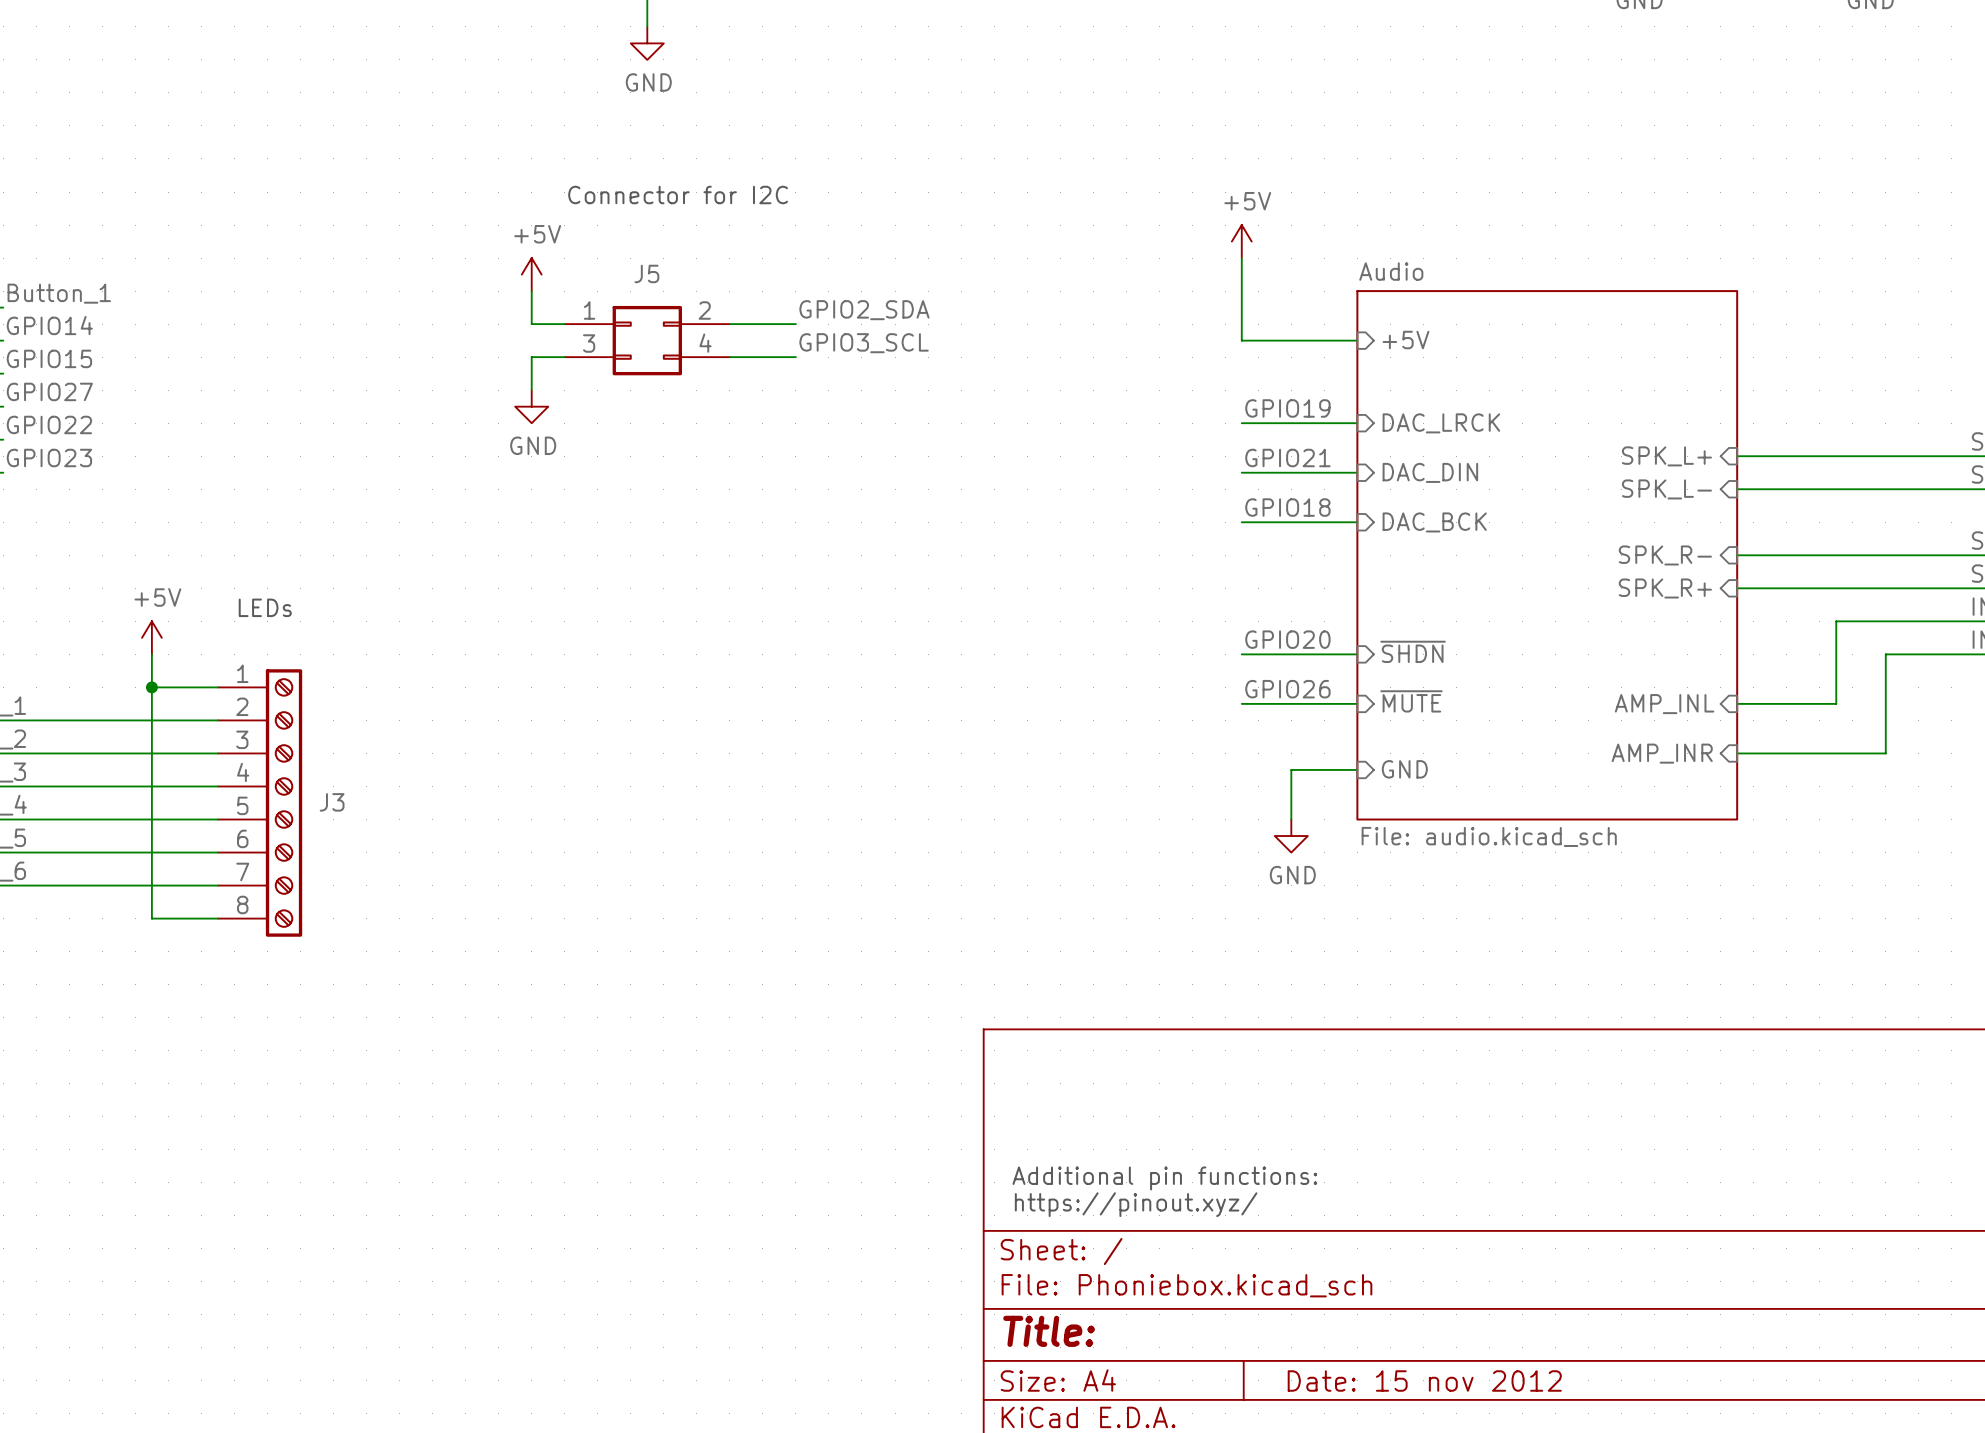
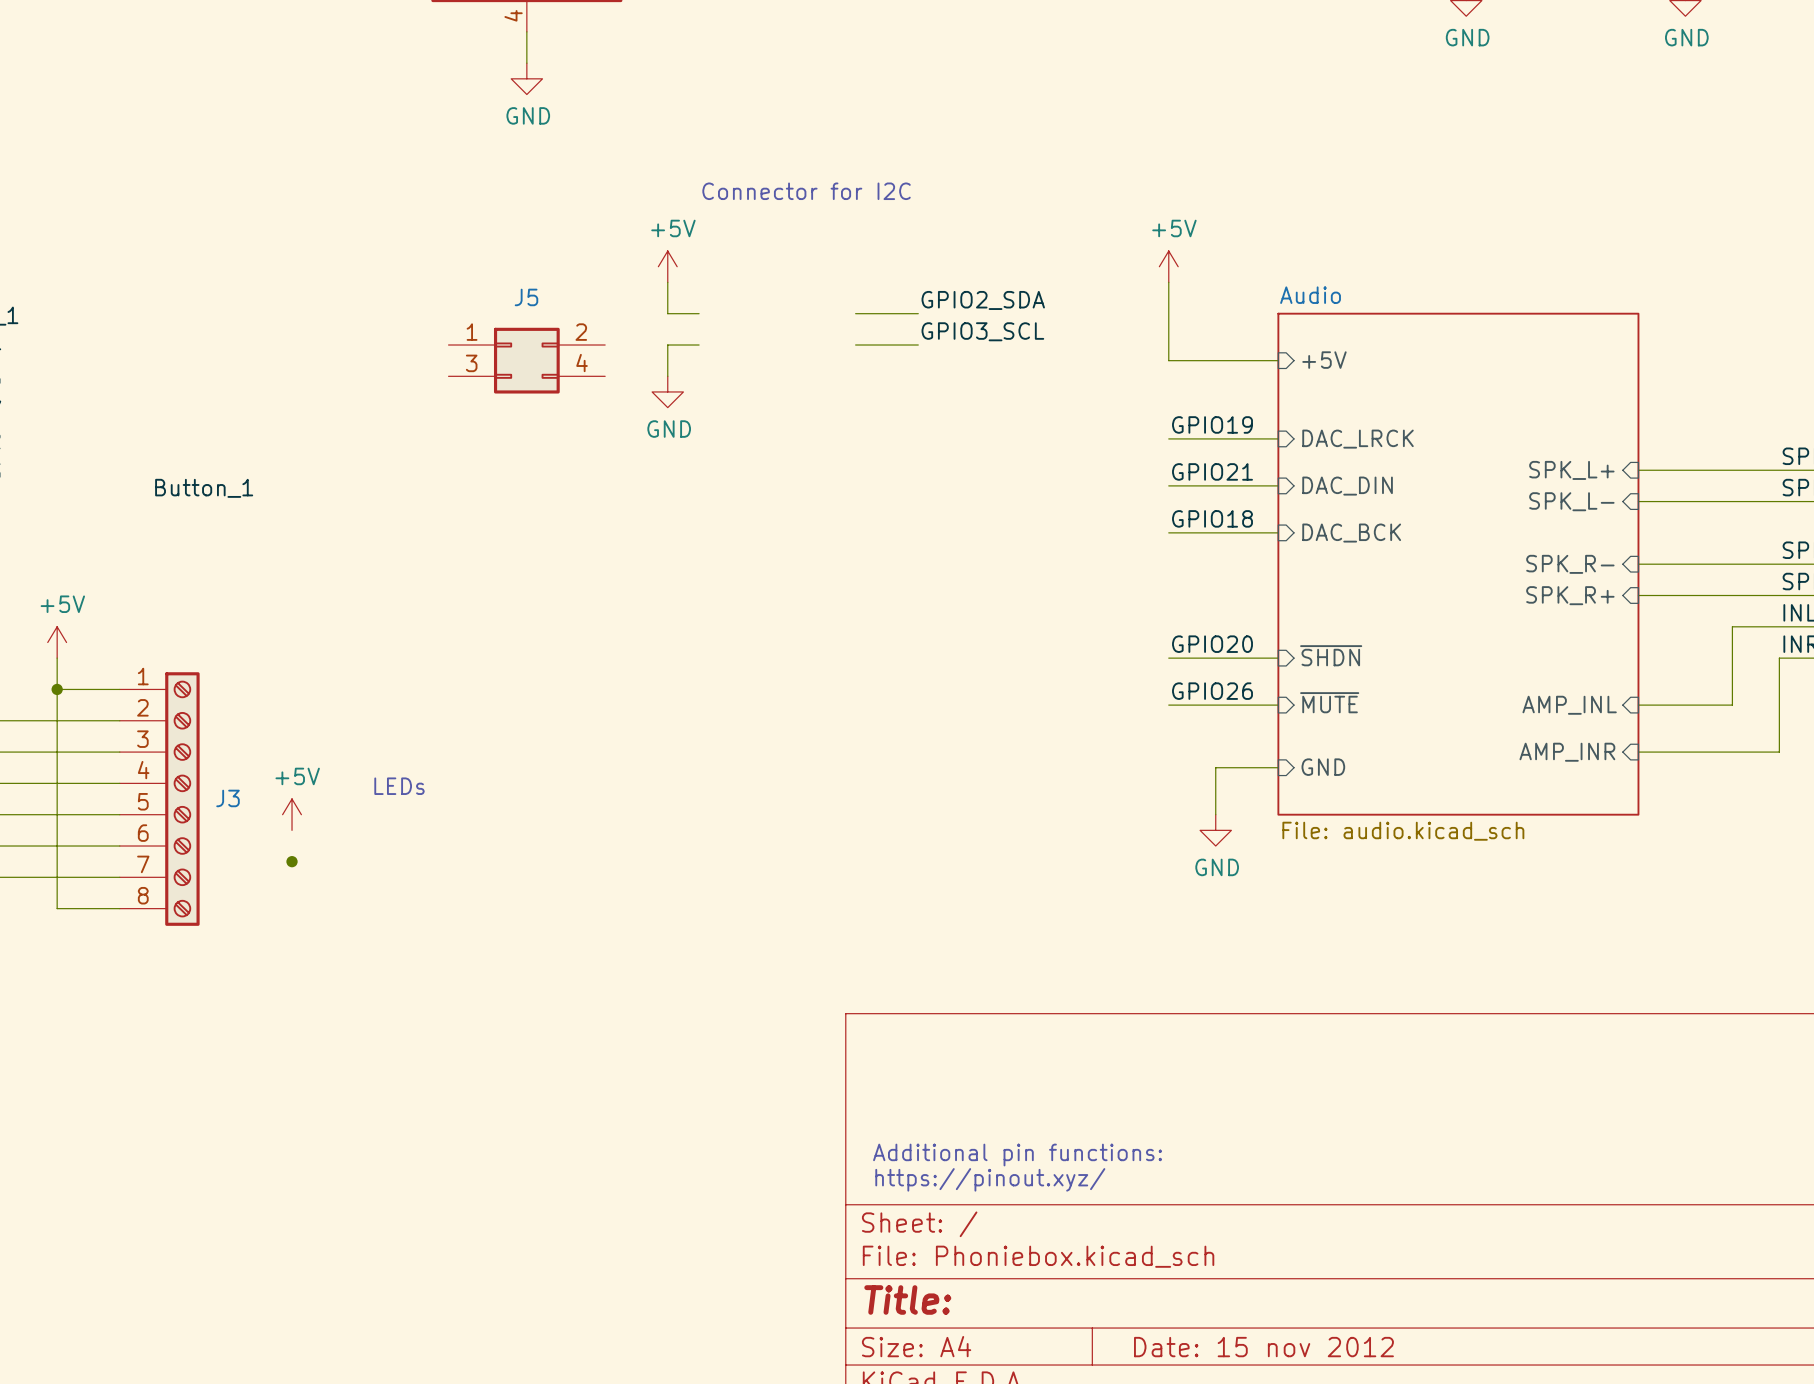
text position: Connector for I2C (678, 194) -> Connector for I2C (806, 191)
power symbol: none -> +5V (667, 266)
power symbol position: +5V (1241, 241) -> +5V (1168, 266)
wire: (1241, 258) (1241, 340) (1324, 340) -> (1168, 282) (1168, 360)
power symbol: +5V (531, 274) -> none
wire: (531, 291) (531, 324) (564, 324) -> (667, 282) (667, 313) (699, 313)
label position: GPIO2_SDA (864, 310) -> GPIO2_SDA (983, 300)
wire: (729, 324) (795, 324) -> (855, 313) (918, 313)
wire: none -> (855, 345) (918, 345)
wire: none -> (1200, 360) (1278, 360)
sheet pin position: +5V (1405, 340) -> +5V (1324, 360)
label position: GPIO3_SCL (864, 343) -> GPIO3_SCL (982, 331)
wire: (564, 357) (531, 357) (531, 390) -> none
wire: (729, 357) (795, 357) -> (699, 345) (667, 345) (667, 376)
power symbol position: GND (531, 406) -> GND (667, 391)
label position: GPIO19 (1287, 408) -> GPIO19 (1212, 424)
wire: (1241, 423) (1324, 423) -> (1200, 438) (1278, 438)
sheet pin position: DAC_LRCK (1441, 423) -> DAC_LRCK (1358, 439)
sheet pin position: SPK_L+ (1666, 456) -> SPK_L+ (1571, 470)
wire: (1737, 456) (1819, 456) -> none
label position: GPIO21 (1287, 457) -> GPIO21 (1212, 471)
wire: (1241, 472) (1324, 472) -> (1200, 485) (1278, 485)
sheet pin position: DAC_DIN (1430, 472) -> DAC_DIN (1347, 486)
label: none -> Button_1 (204, 488)
sheet pin position: SPK_L- (1666, 489) -> SPK_L- (1571, 501)
wire: (1737, 489) (1819, 489) -> none
label position: GPIO18 (1287, 507) -> GPIO18 (1212, 518)
wire: (1241, 522) (1324, 522) -> (1200, 532) (1278, 532)
sheet pin position: DAC_BCK (1434, 522) -> DAC_BCK (1351, 533)
sheet Audio position: (1547, 555) -> (1458, 564)
sheet pin position: SPK_R- (1665, 555) -> SPK_R- (1570, 564)
wire: (1737, 555) (1819, 555) -> none
sheet pin position: SPK_R+ (1665, 588) -> SPK_R+ (1570, 595)
wire: (1737, 588) (1819, 588) -> none
text position: LEDs (265, 607) -> LEDs (399, 786)
wire: (1918, 621) (1836, 621) (1836, 703) -> (1732, 626) (1732, 705) (1654, 705)
label position: GPIO20 (1287, 639) -> GPIO20 (1212, 644)
sheet pin position: ~{SHDN} (1413, 651) -> ~{SHDN} (1331, 655)
wire: (1241, 654) (1324, 654) -> (1200, 658) (1278, 658)
wire: (1968, 654) (1885, 654) (1885, 753) -> (1779, 658) (1779, 752) (1701, 752)
label position: GPIO26 (1287, 689) -> GPIO26 (1212, 691)
sheet pin position: ~{MUTE} (1411, 701) -> ~{MUTE} (1329, 702)
wire: (1241, 703) (1324, 703) -> (1200, 705) (1278, 705)
wire: (1737, 703) (1819, 703) -> none
sheet pin position: AMP_INL (1664, 704) -> AMP_INL (1569, 705)
sheet pin position: AMP_INR (1662, 753) -> AMP_INR (1567, 752)
wire: (1737, 753) (1819, 753) -> none
wire: (1357, 769) (1291, 769) (1291, 819) -> (1278, 767) (1215, 767) (1215, 814)
sheet pin position: GND (1404, 769) -> GND (1323, 767)
power symbol: none -> +5V (292, 814)
power symbol position: GND (1291, 836) -> GND (1215, 830)
junction: none -> (292, 861)

